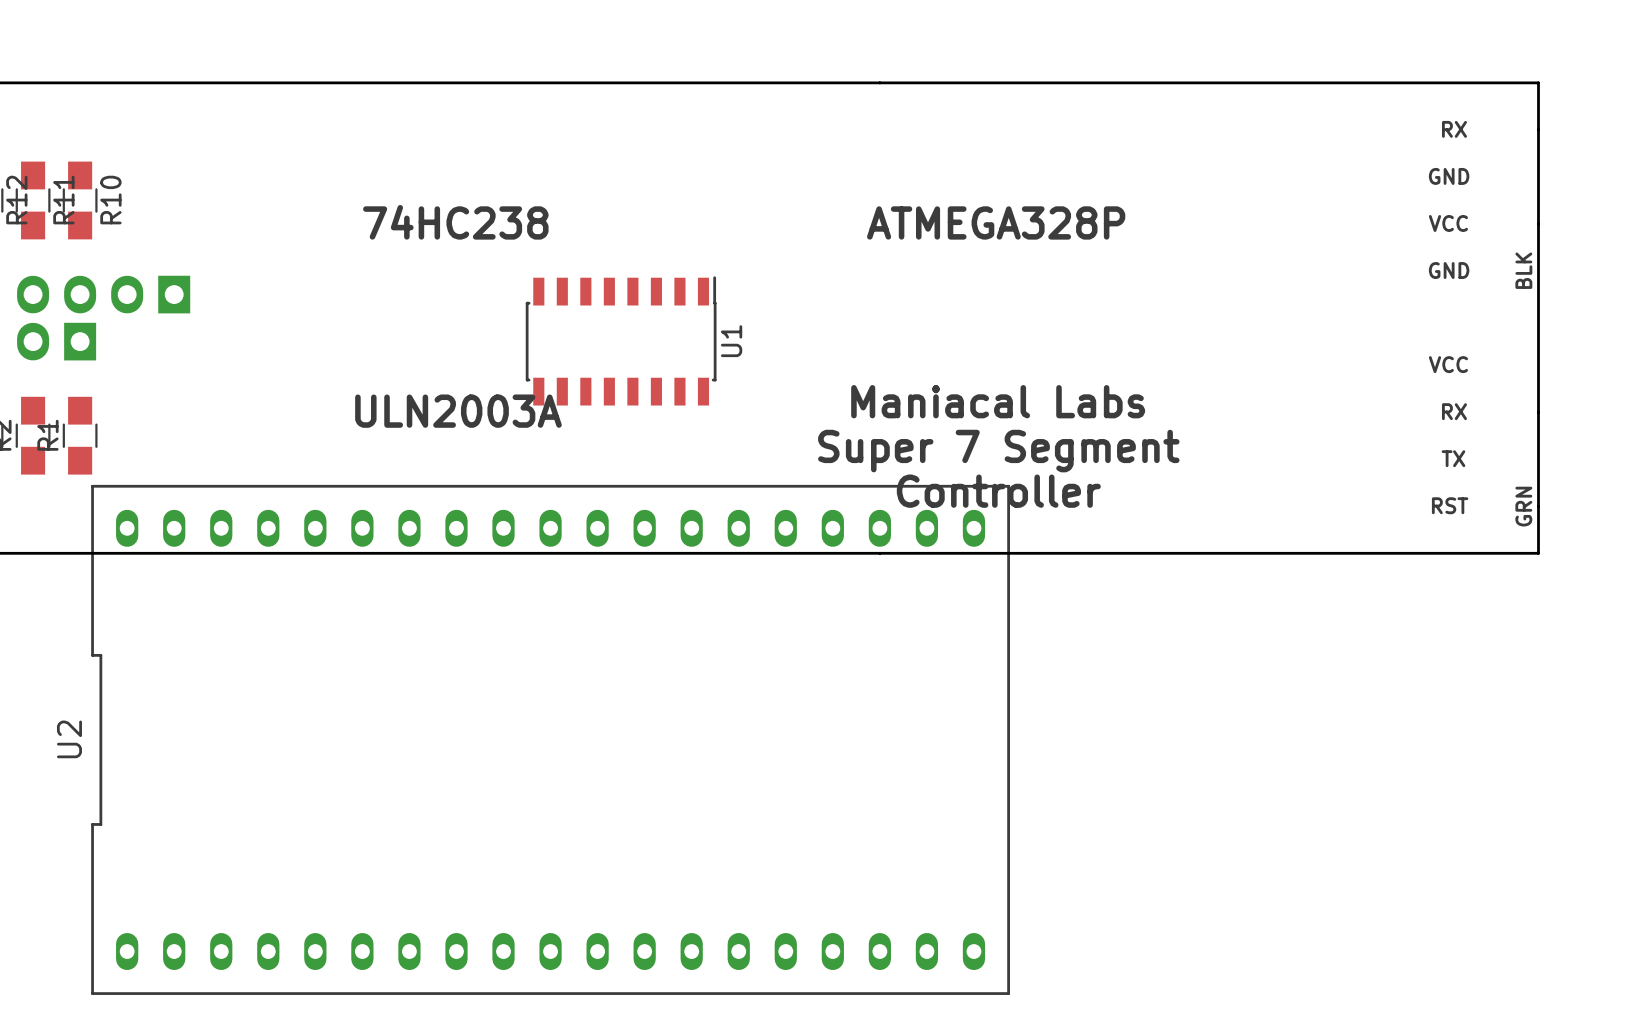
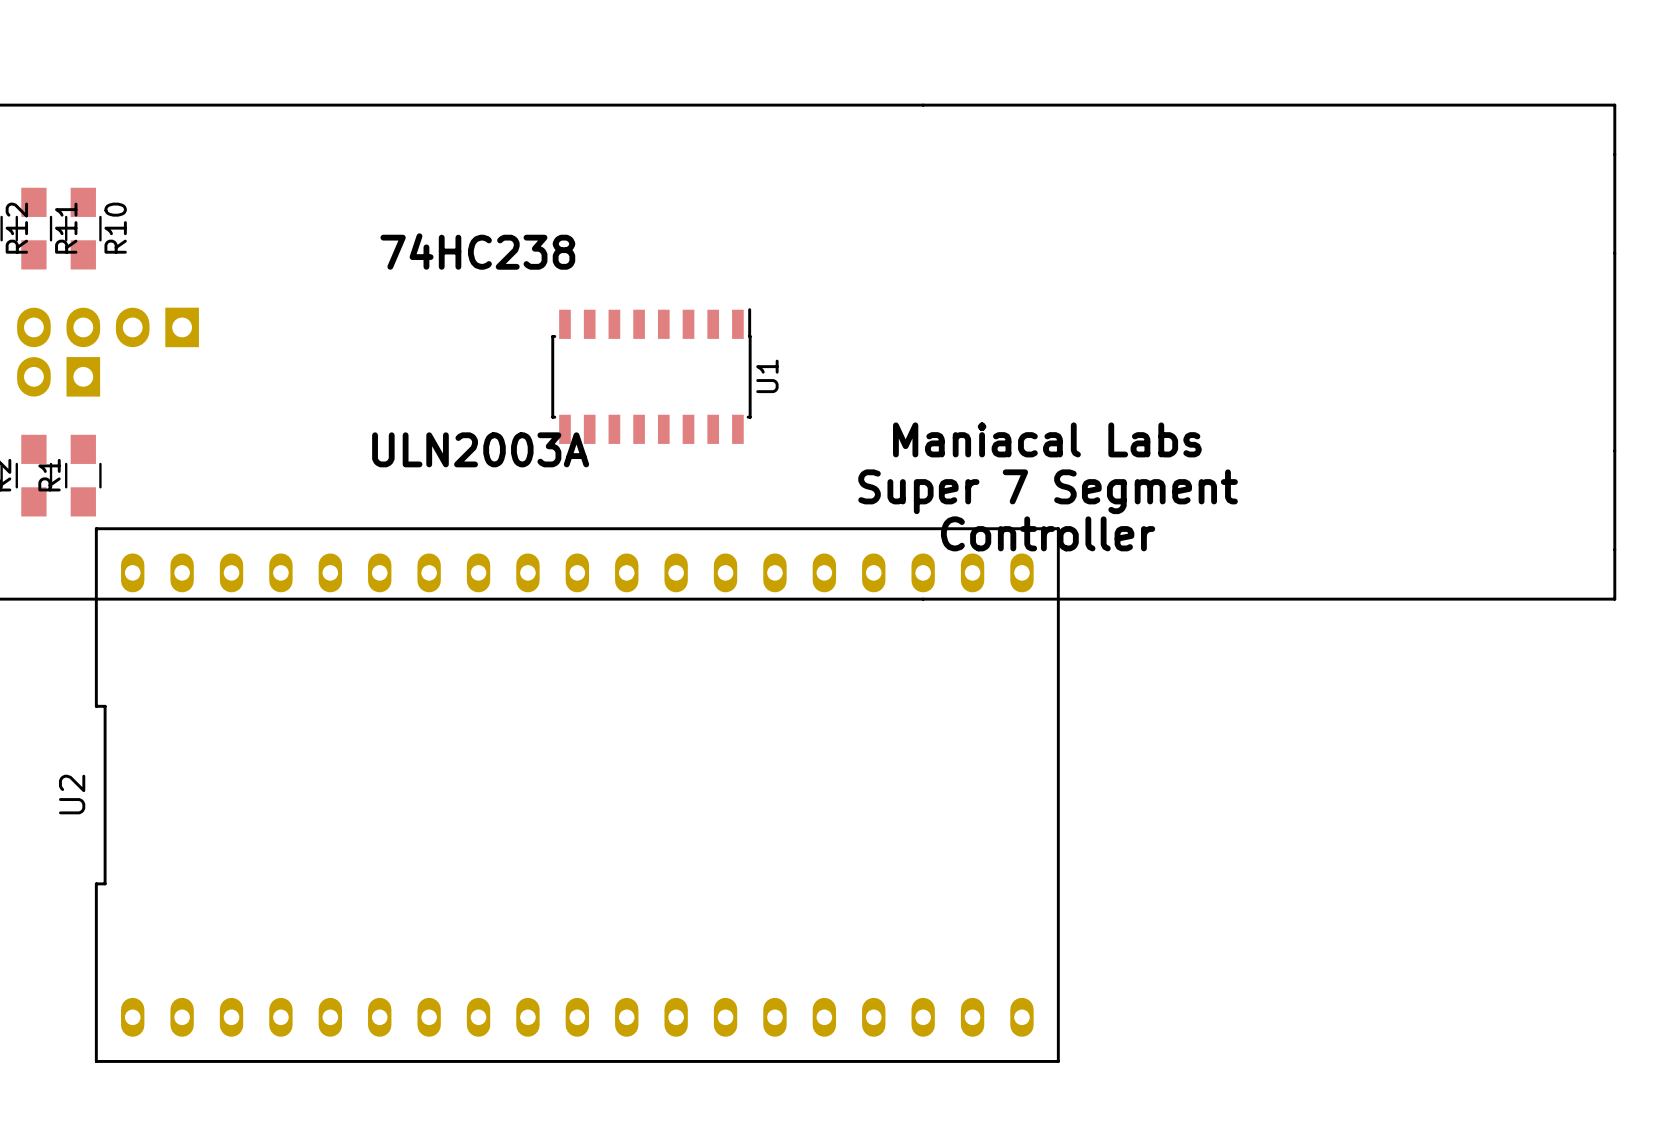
text: RX (1454, 129) -> none
text: GND (1449, 176) -> none
text: ATMEGA328P (996, 222) -> none
text: VCC (1448, 223) -> none
text: GND (1449, 270) -> none
text: BLK (1523, 270) -> none
text: VCC (1448, 364) -> none
text: RX (1454, 411) -> none
text: TX (1453, 458) -> none
text: RST (1450, 505) -> none
text: GRN (1523, 506) -> none

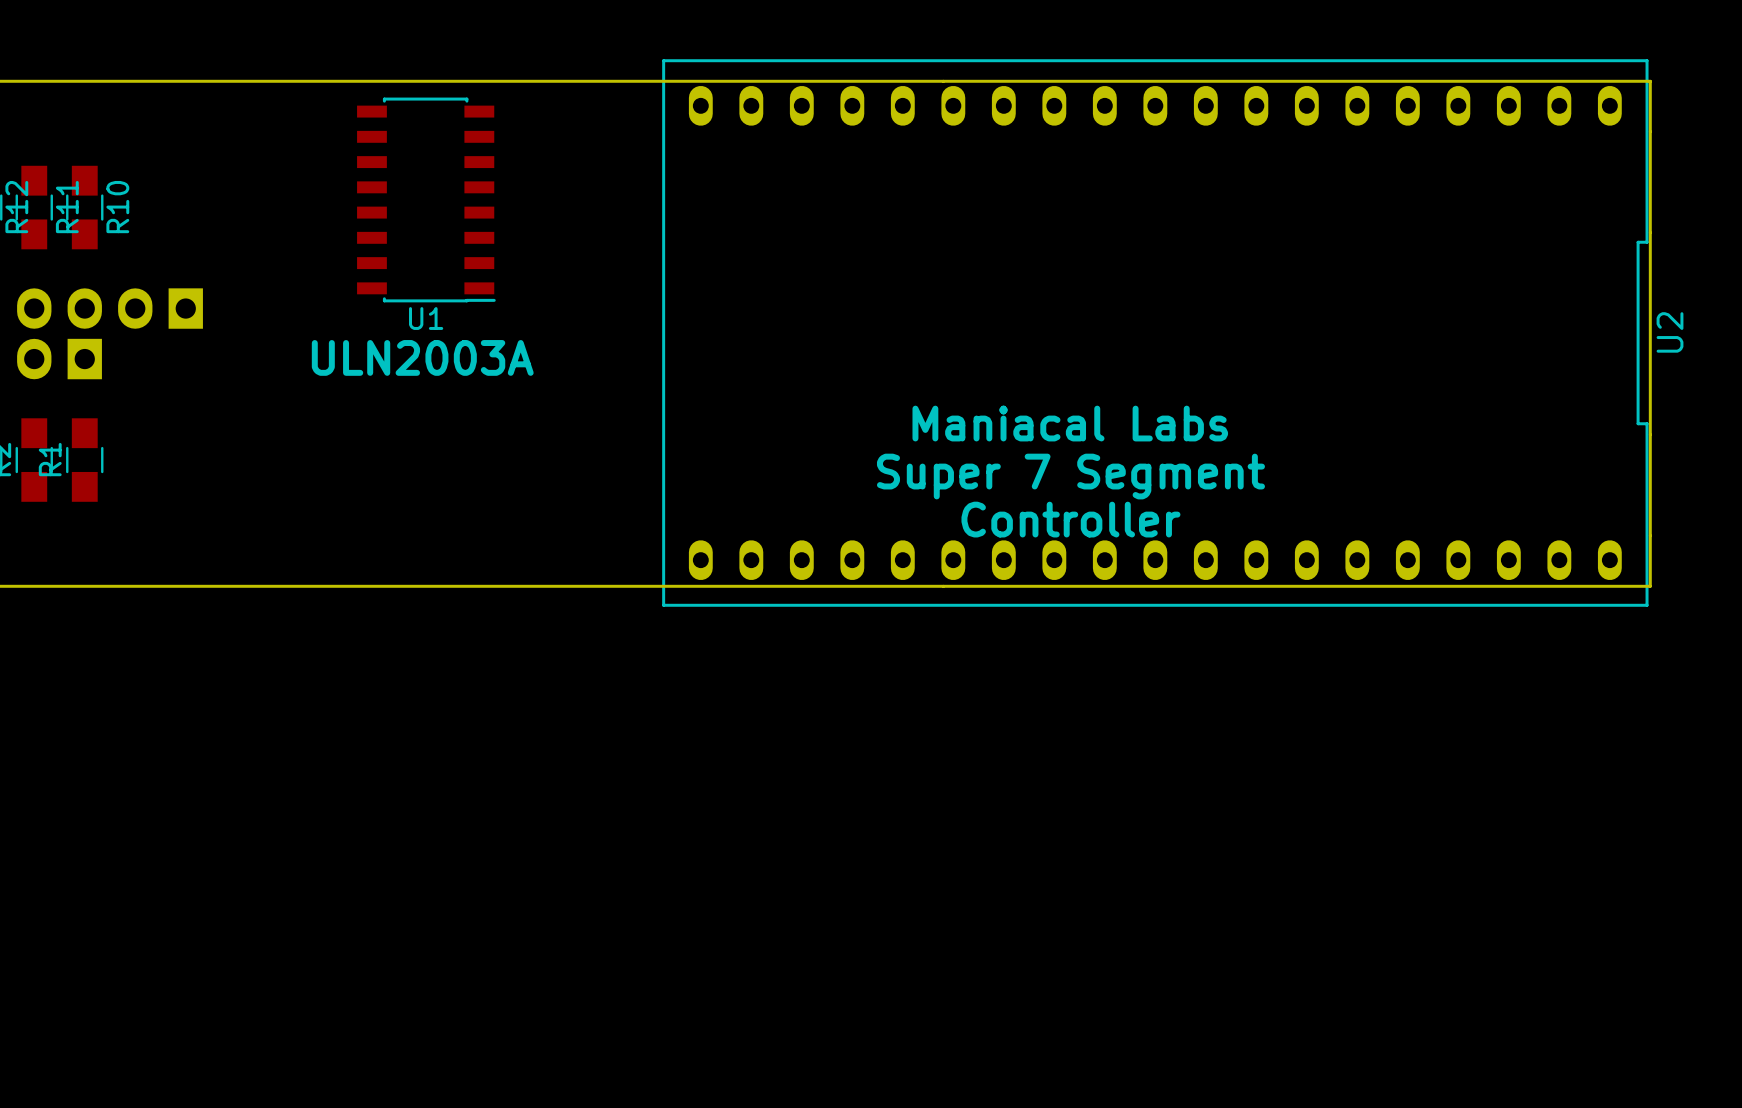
text: 74HC238 (477, 251) -> none
U1 rotation: 0° (651, 376) -> 90° clockwise (426, 199)
U1 position: (651, 376) -> (426, 199)
text position: ULN2003A (480, 449) -> ULN2003A (422, 357)
U2 rotation: 0° (577, 795) -> 180° (1155, 333)
U2 position: (577, 795) -> (1155, 333)

